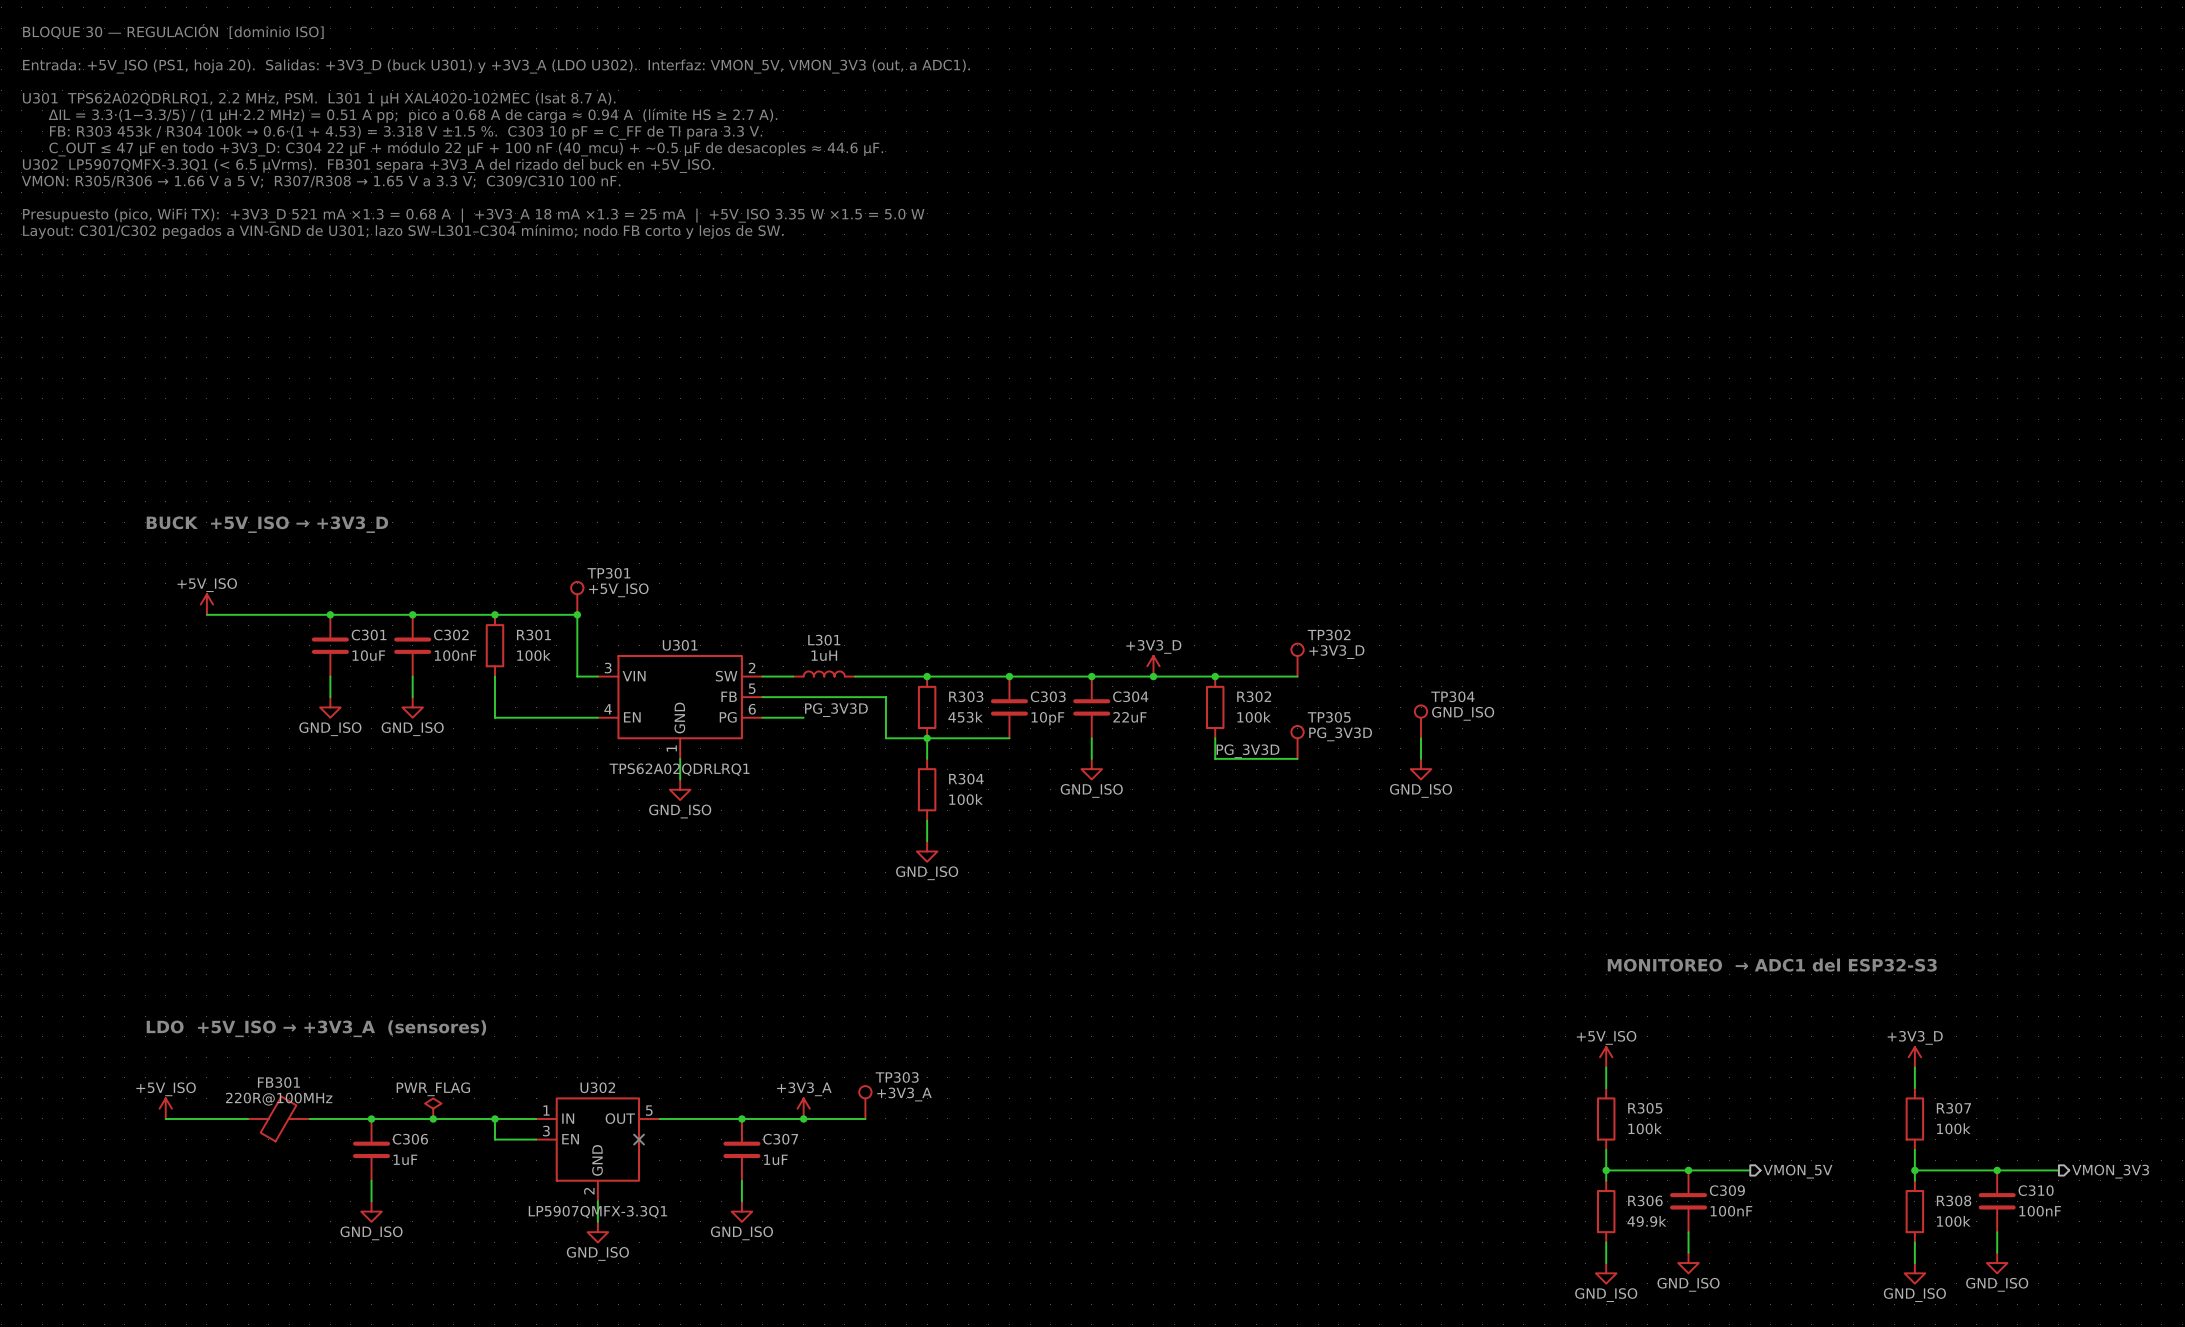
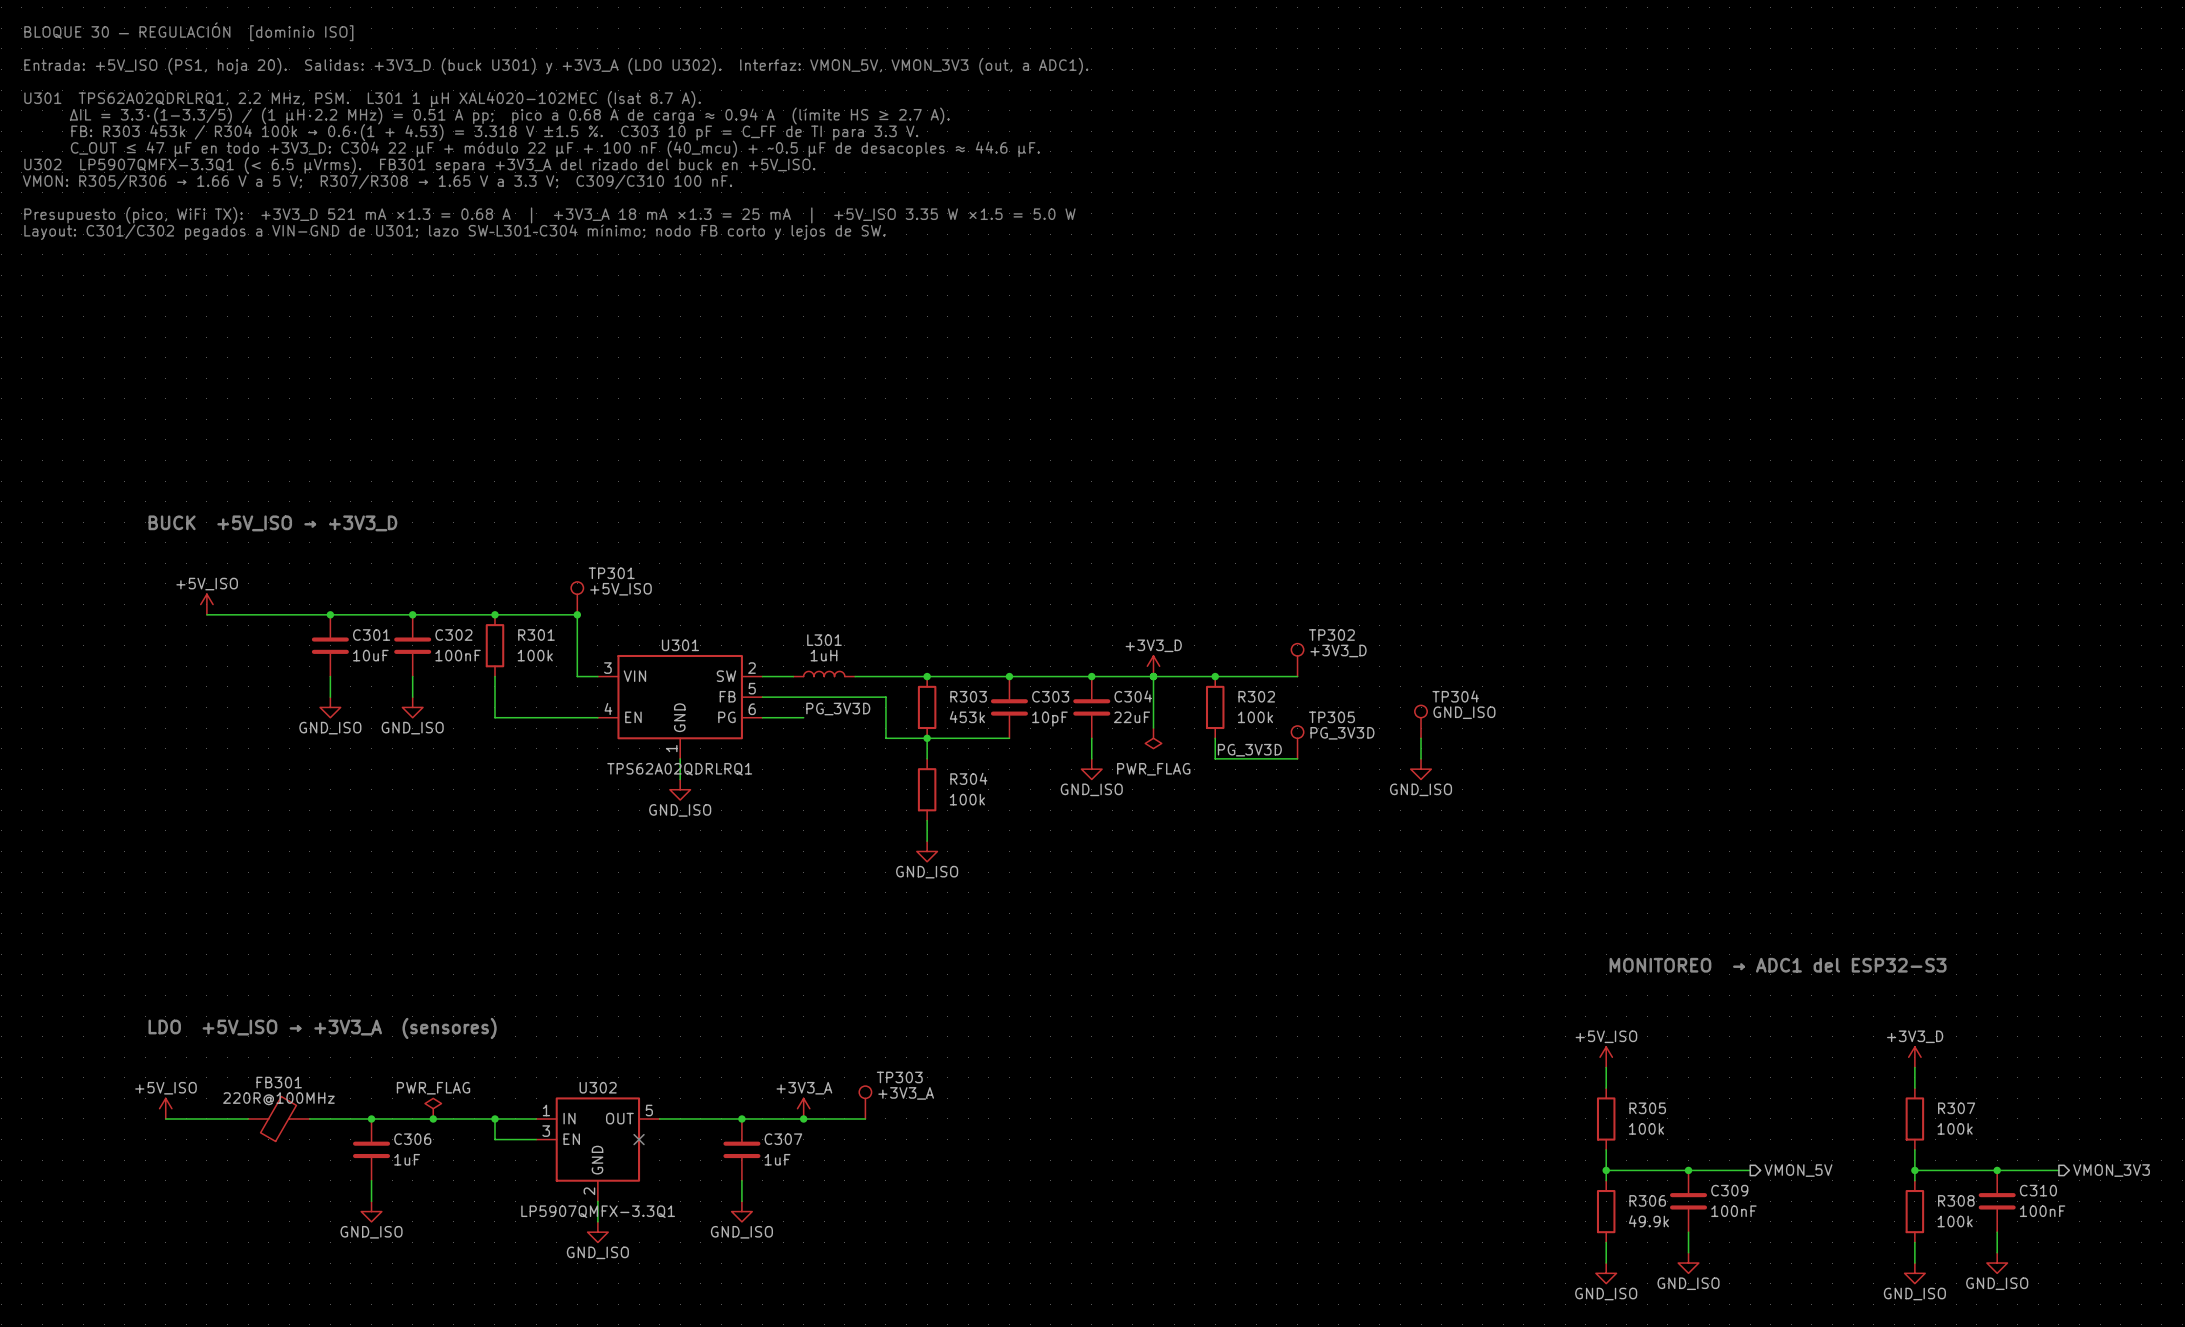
wire: none -> (1153, 676) (1153, 728)
power symbol: none -> PWR_FLAG (1153, 738)

